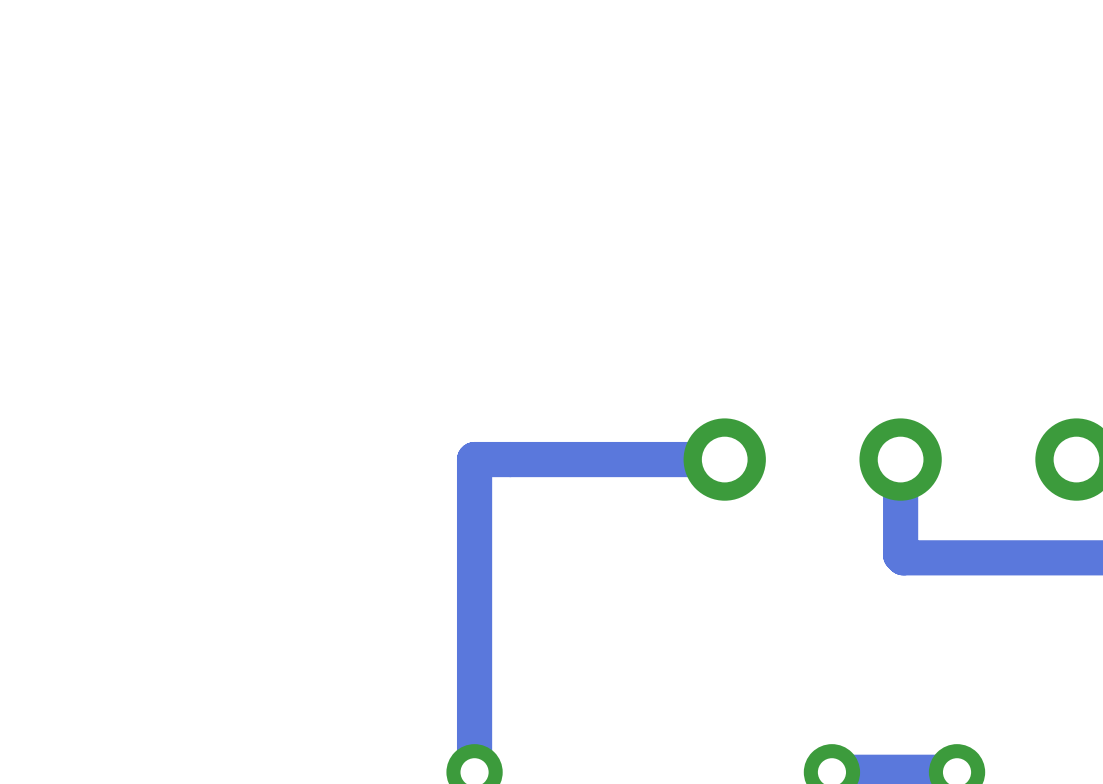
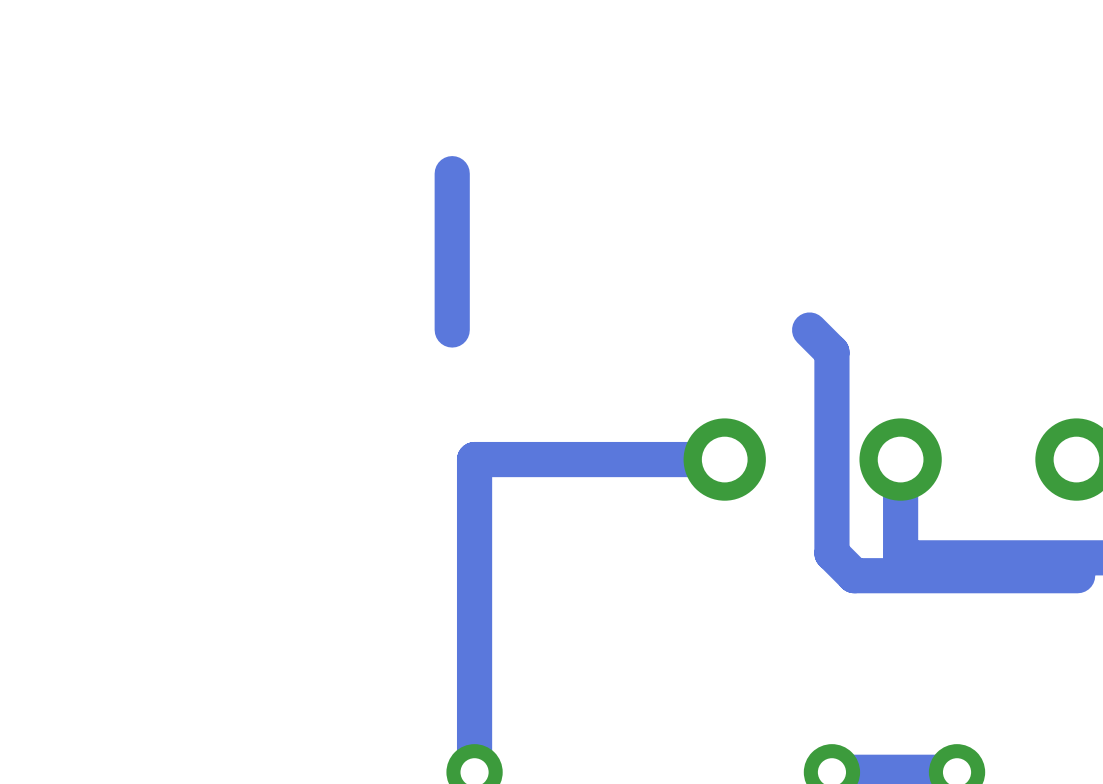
bottom track: none -> (452, 173) (452, 330)
bottom track: none -> (809, 330) (831, 352) (831, 553) (854, 575) (1077, 575)

